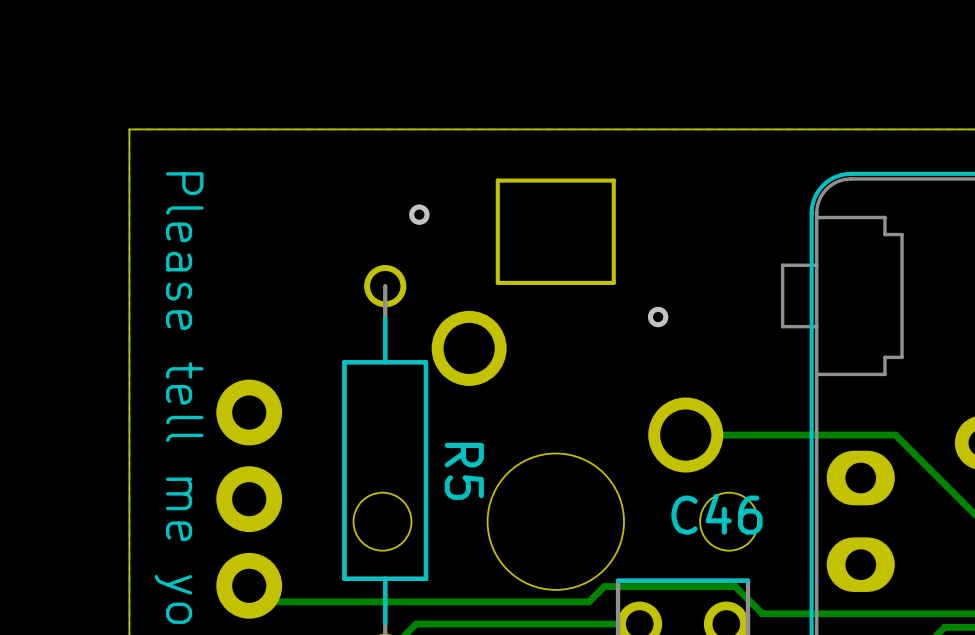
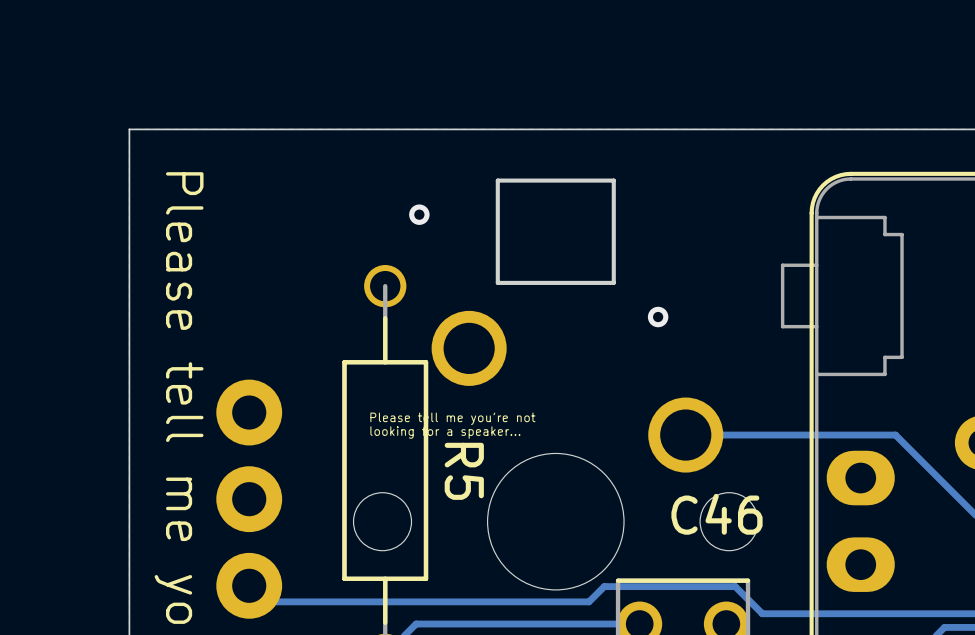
text: none -> Please tell me you're not (452, 418)
text: none -> looking for a speaker... (445, 432)

